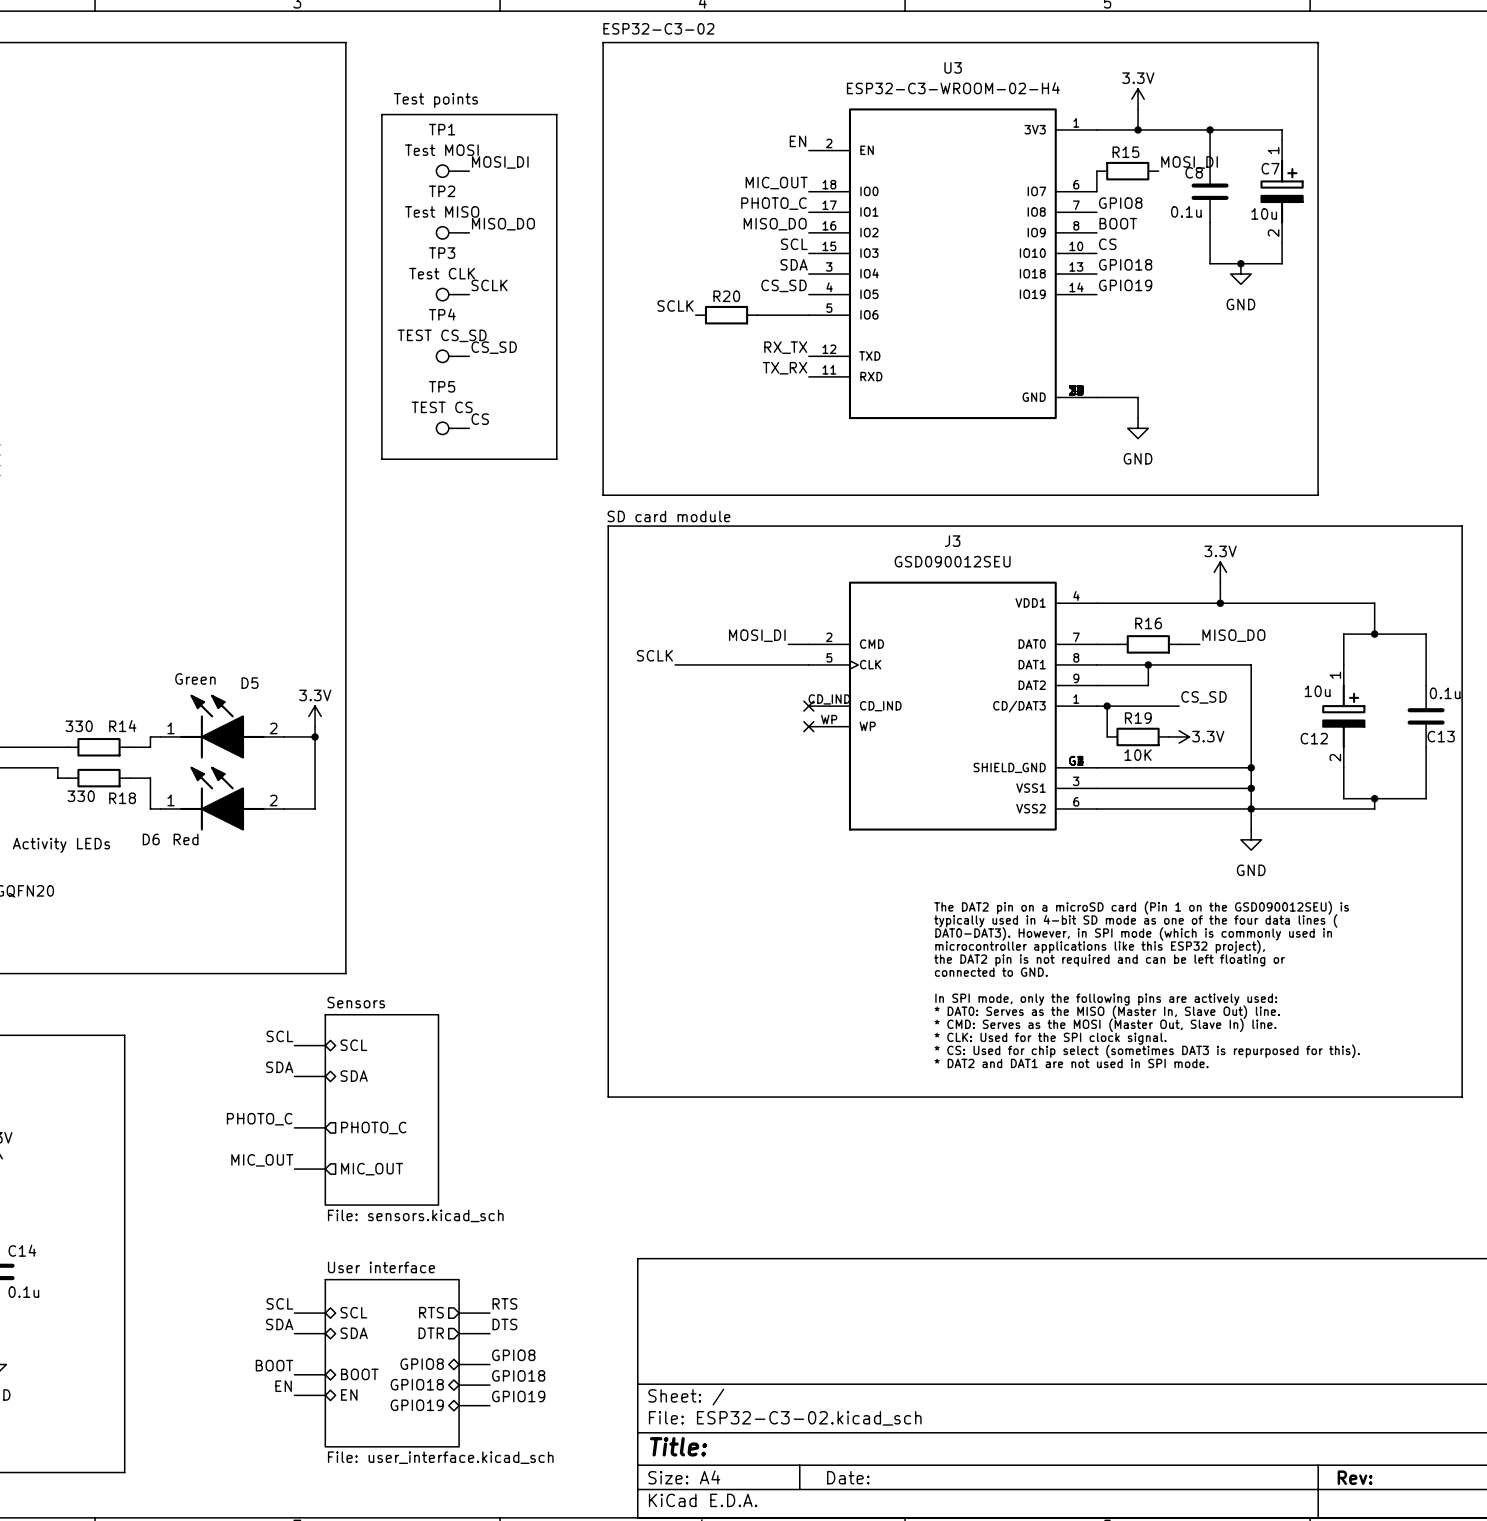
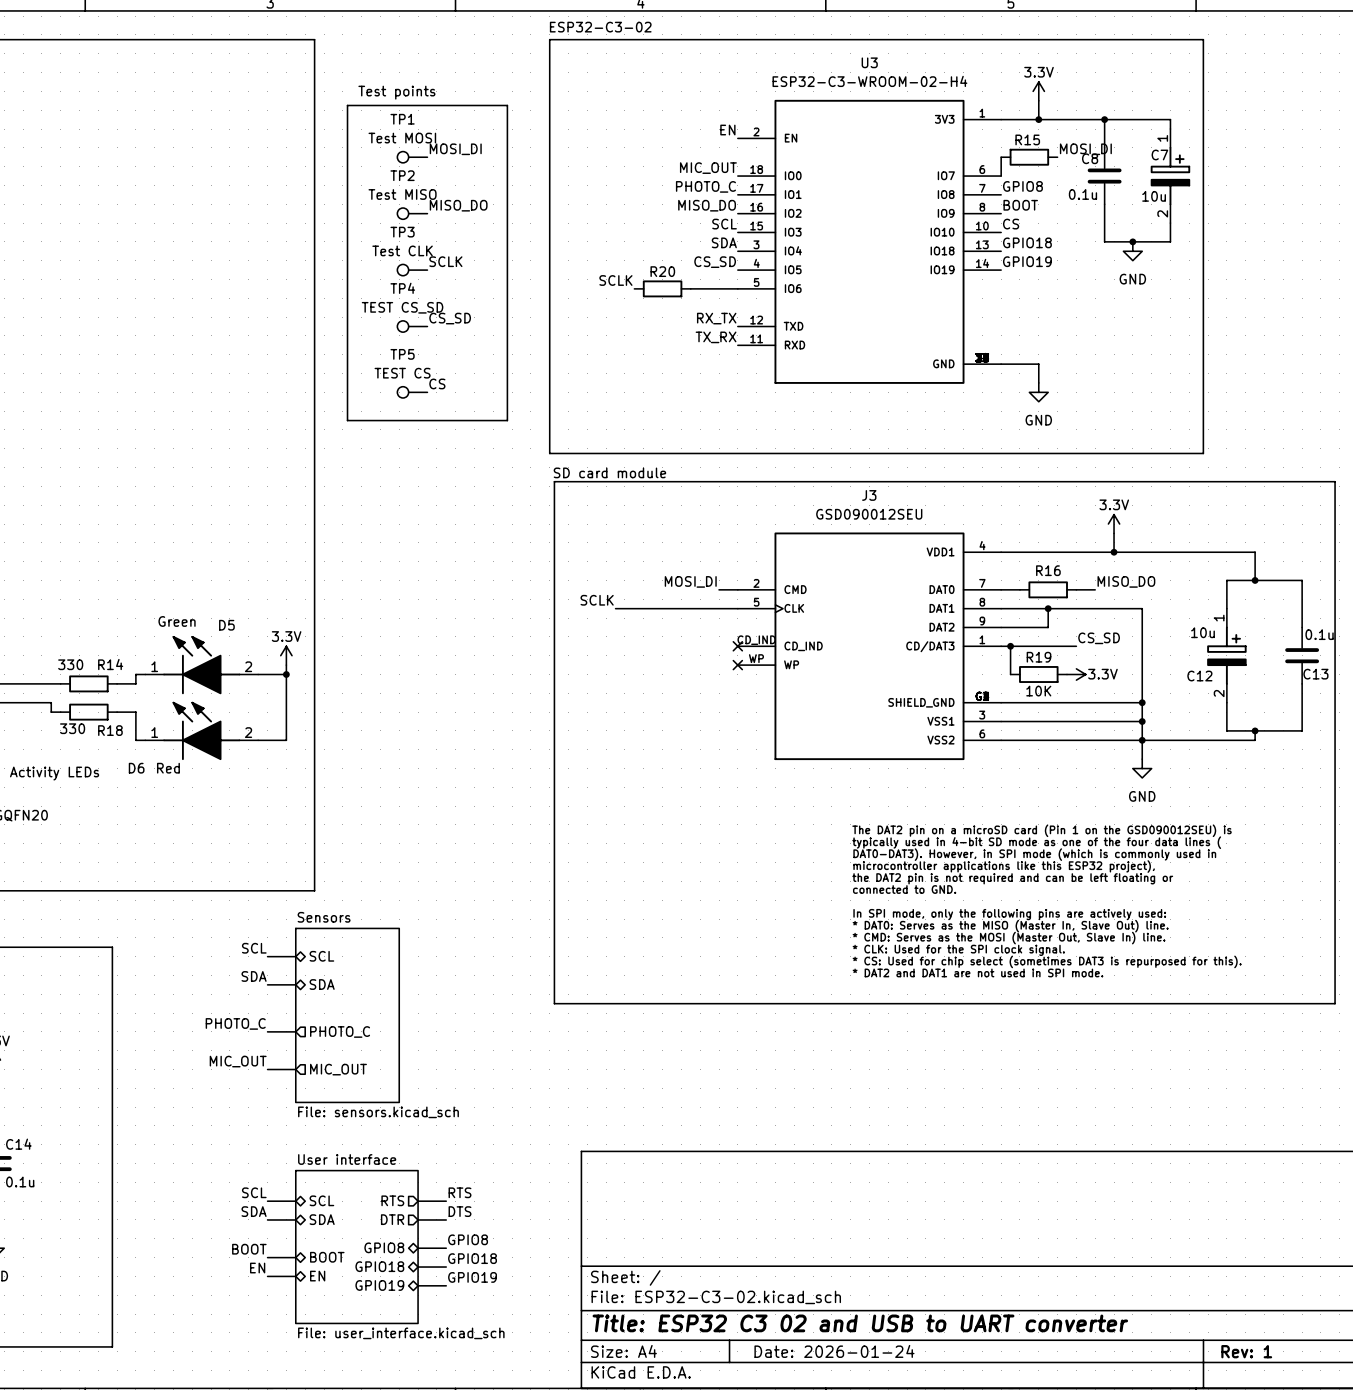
title block: Title: (678, 1446) -> Title: ESP32 C3 02 and USB to UART converter (860, 1323)
title block: Date: (848, 1477) -> Date: 2026-01-24 (834, 1351)
title block: Rev: (1355, 1477) -> Rev: 1 (1246, 1351)

